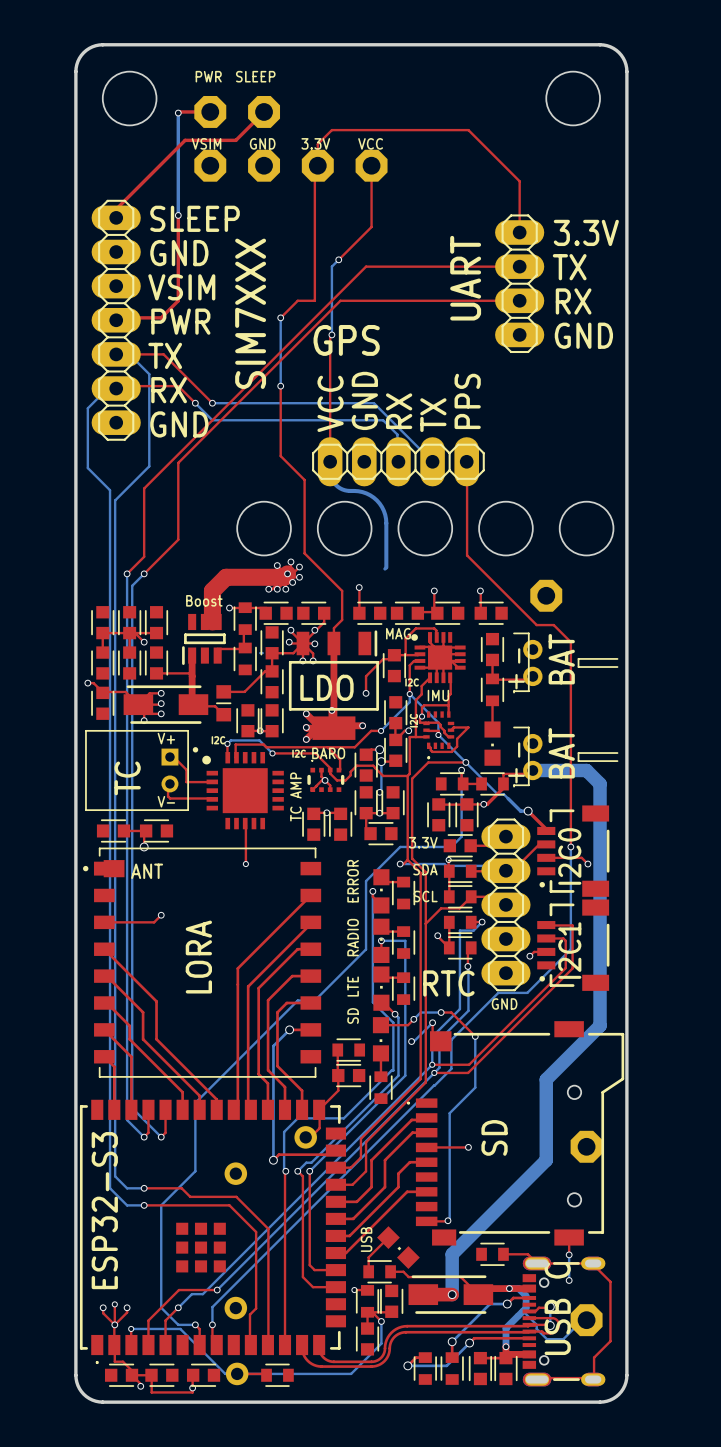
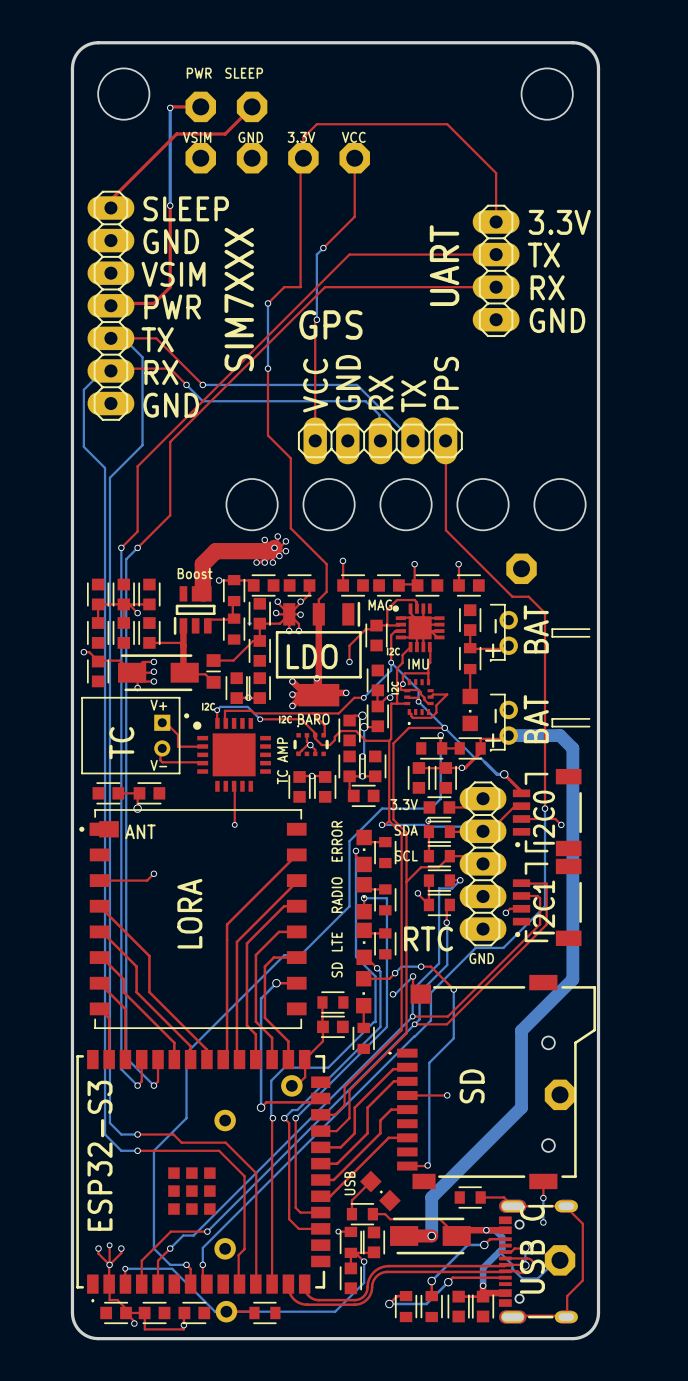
bottom track: (330, 461) (330, 476) (337, 486) (344, 490) (366, 493) (376, 500) (382, 507) (386, 523) (385, 568) -> none

